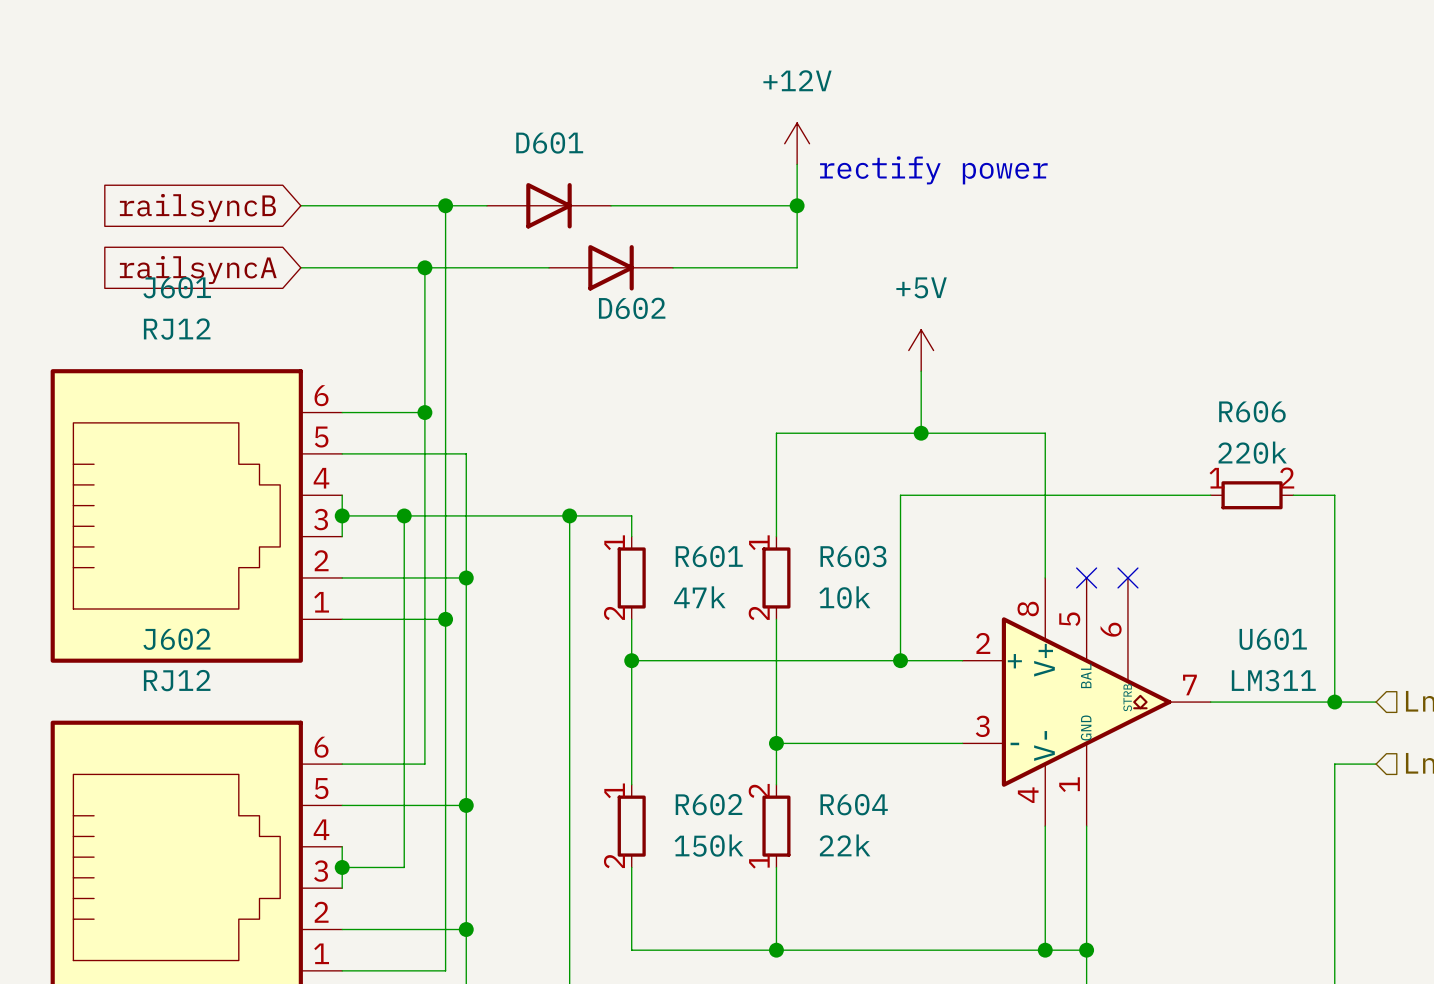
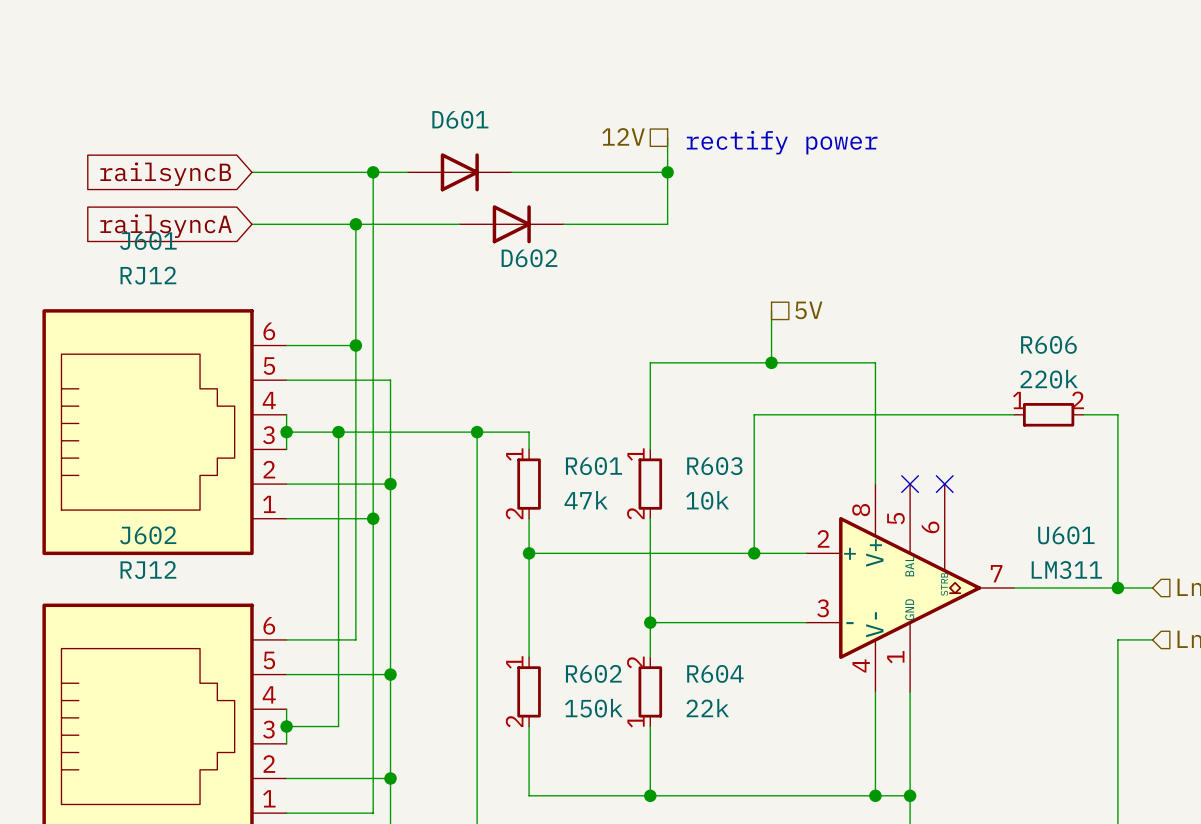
power symbol: +12V (797, 143) -> none
hierarchical label: none -> 12V (623, 136)
power symbol: +5V (921, 350) -> none
hierarchical label: none -> 5V (808, 310)

